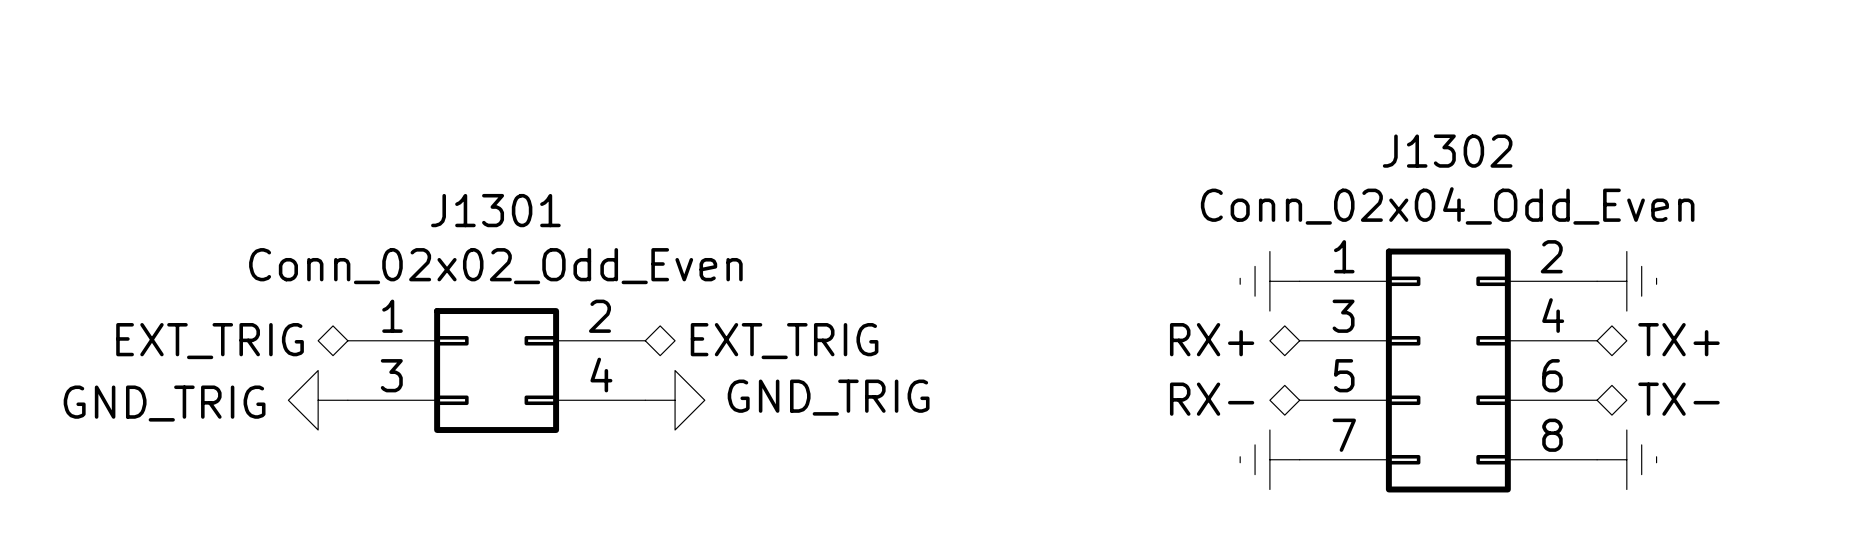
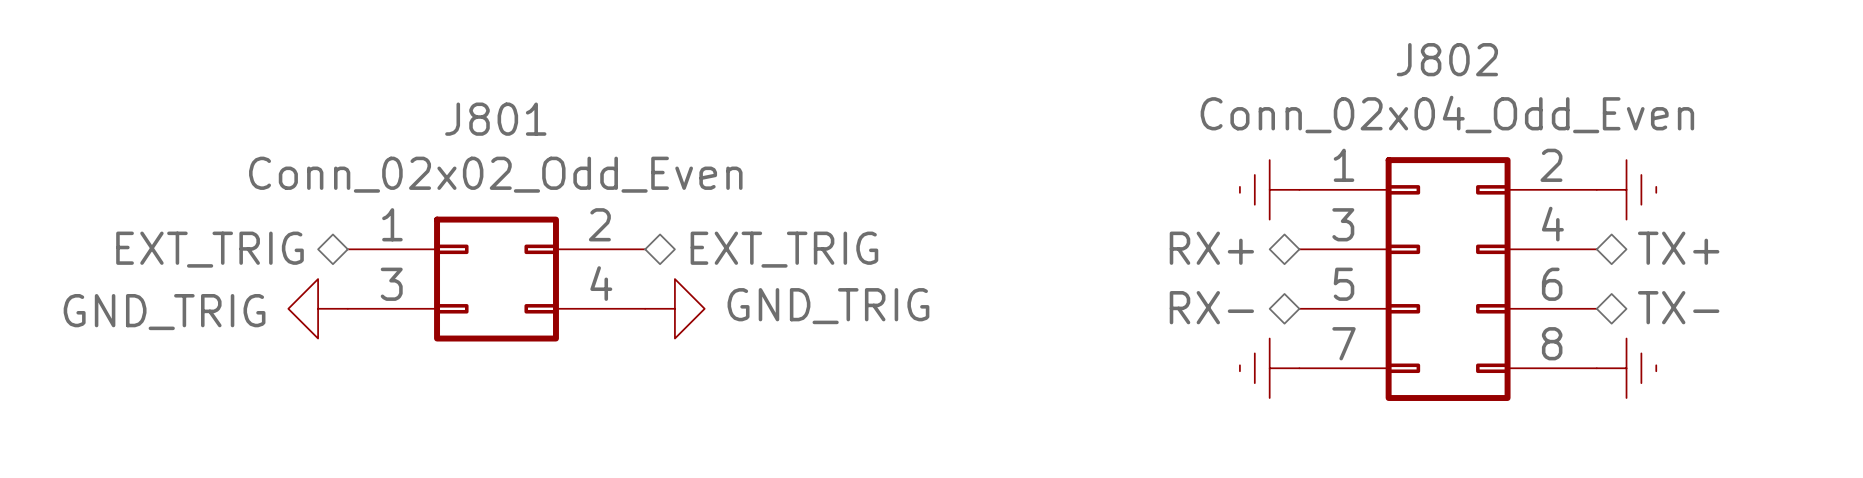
J1302 name: J1302 (1447, 151) -> J802 (1447, 59)
J1301 name: J1301 (495, 210) -> J801 (495, 119)

